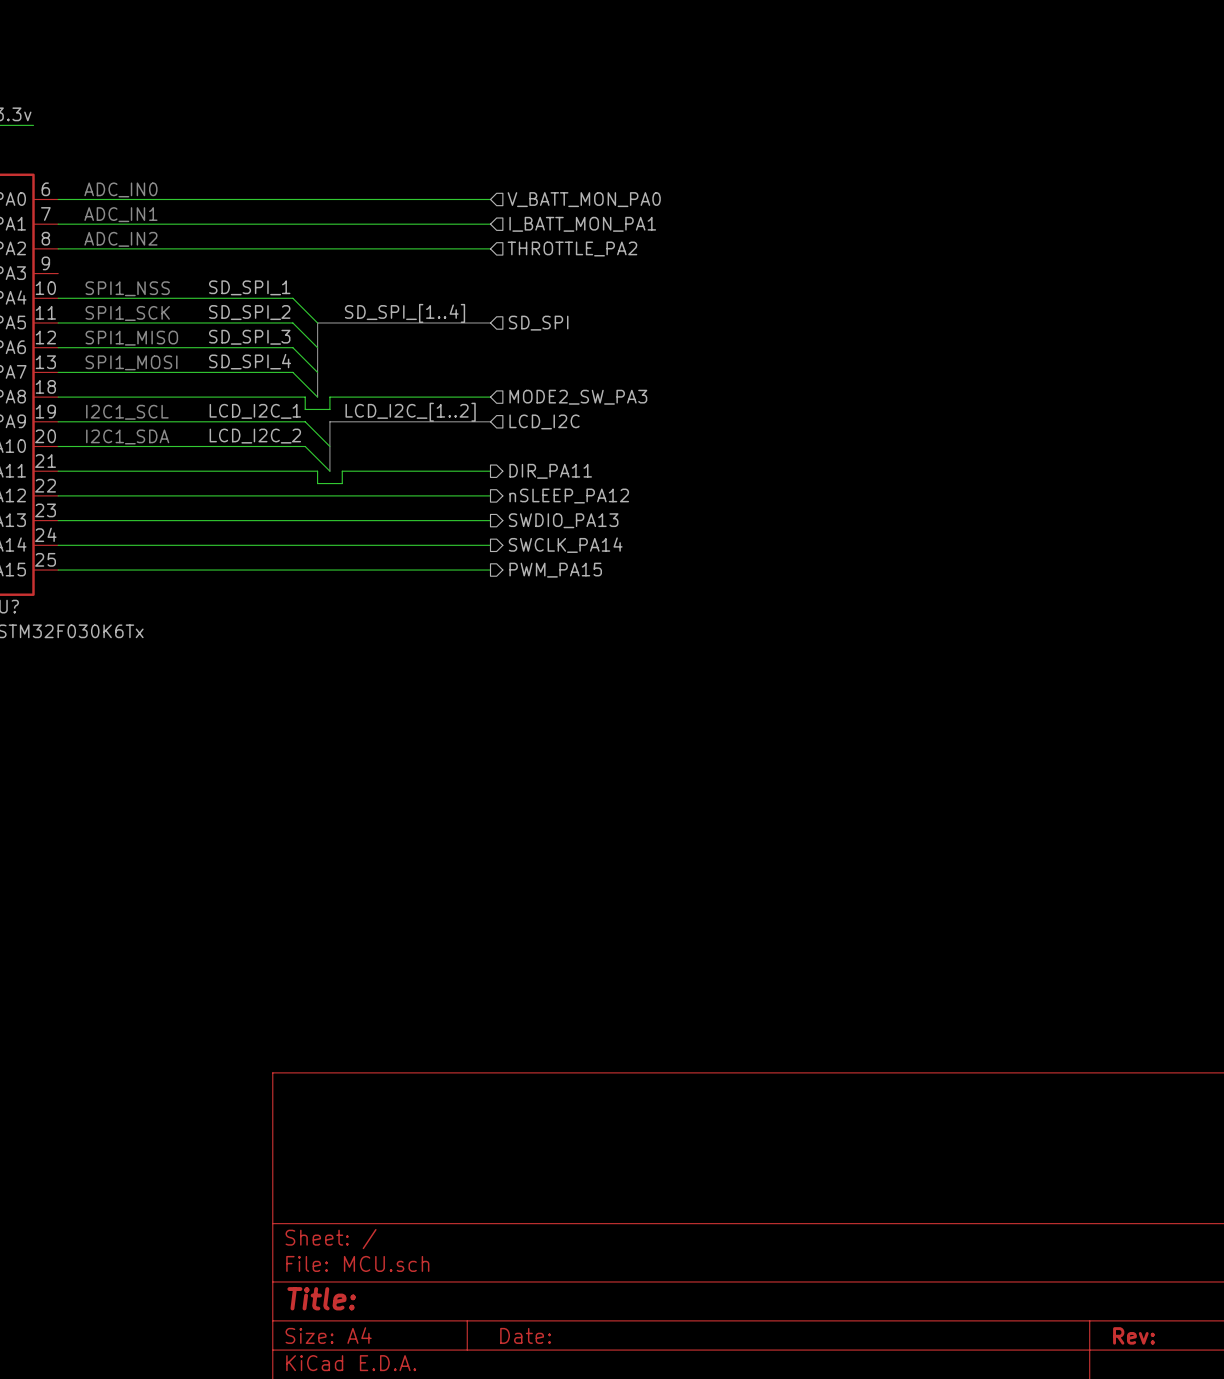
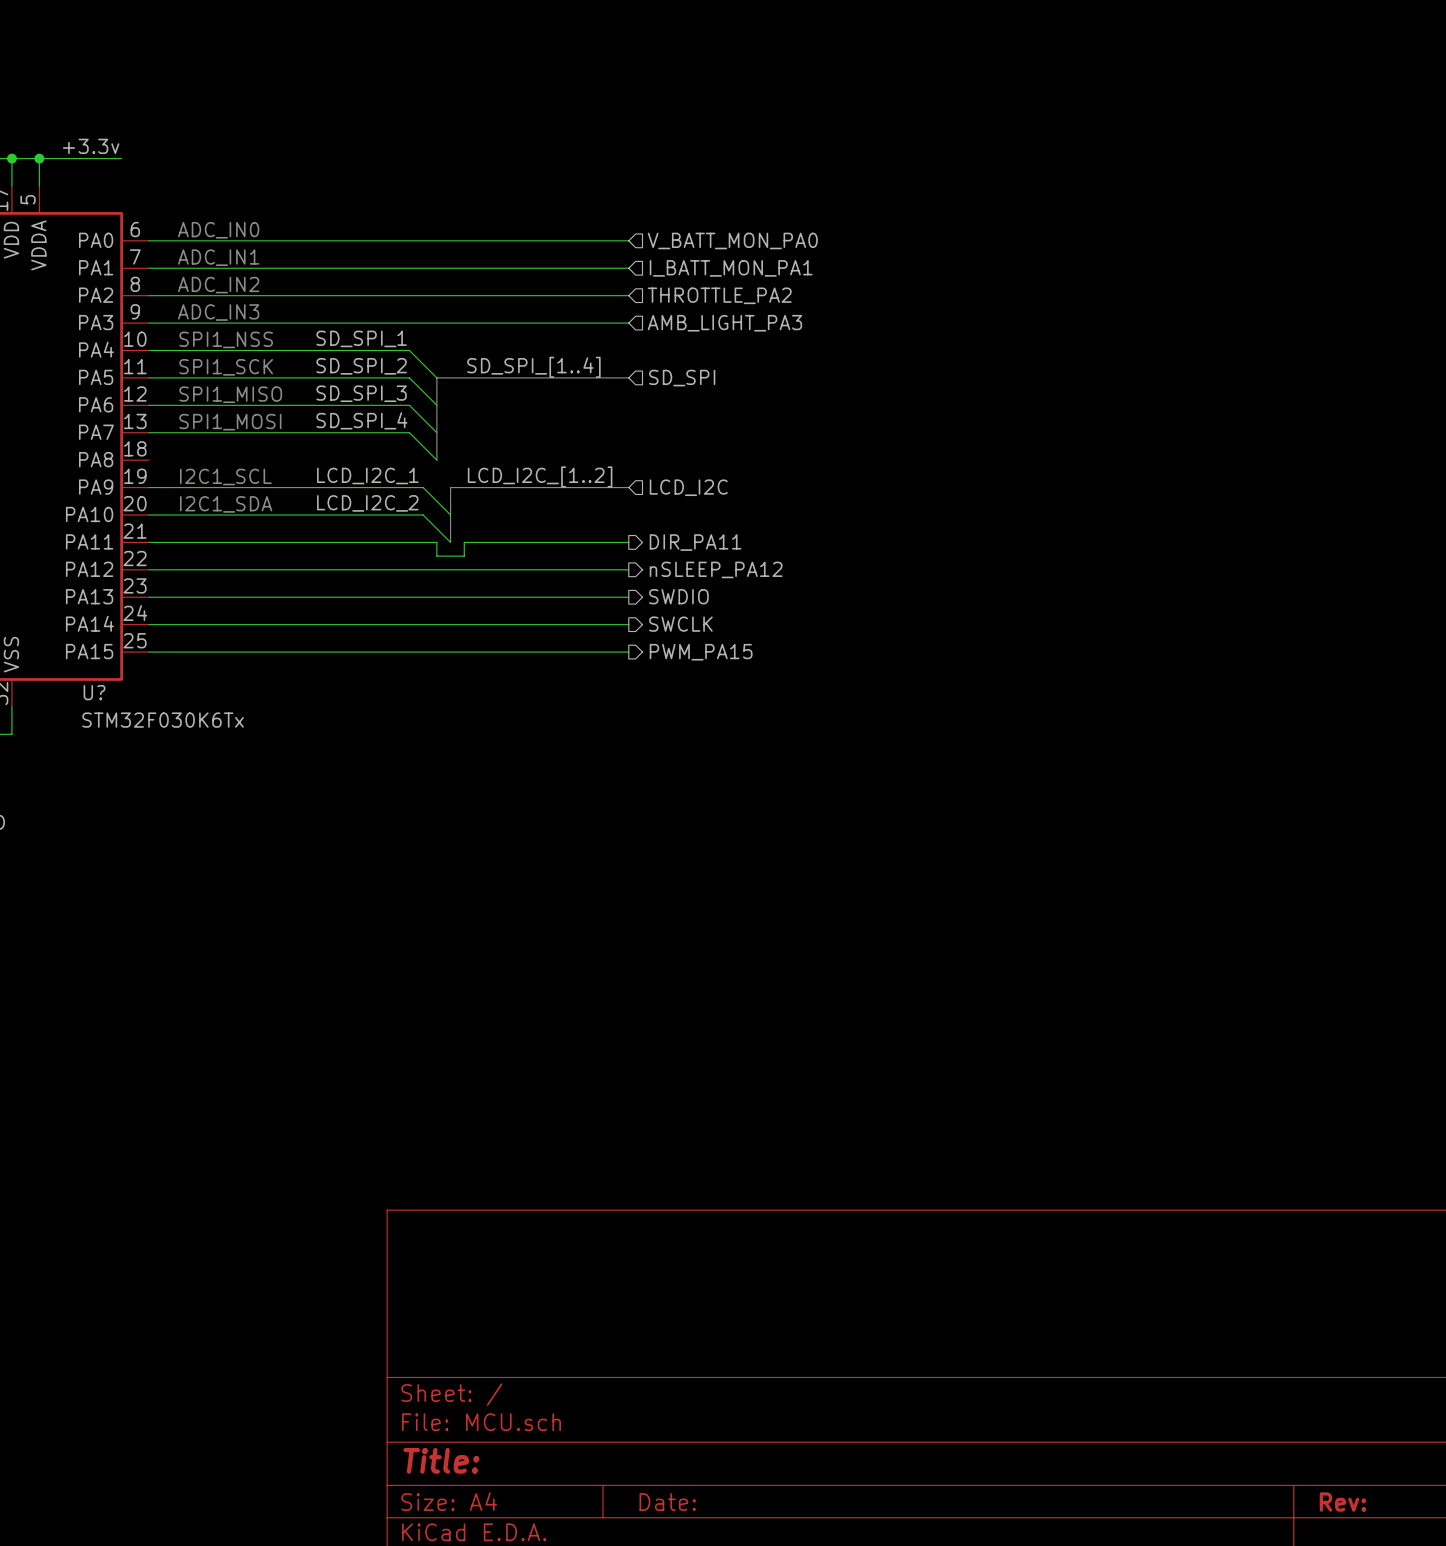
text: none -> ADC_IN3 (218, 312)
wire: none -> (149, 323) (628, 323)
hierarchical label: none -> AMB_LIGHT_PA3 (724, 323)
wire: (58, 397) (305, 397) (305, 409) (329, 409) (329, 397) (490, 397) -> none
hierarchical label: MODE2_SW_PA3 (578, 397) -> none
hierarchical label: SWDIO_PA13 (563, 520) -> SWDIO (678, 596)
hierarchical label: SWCLK_PA14 (565, 545) -> SWCLK (680, 624)

